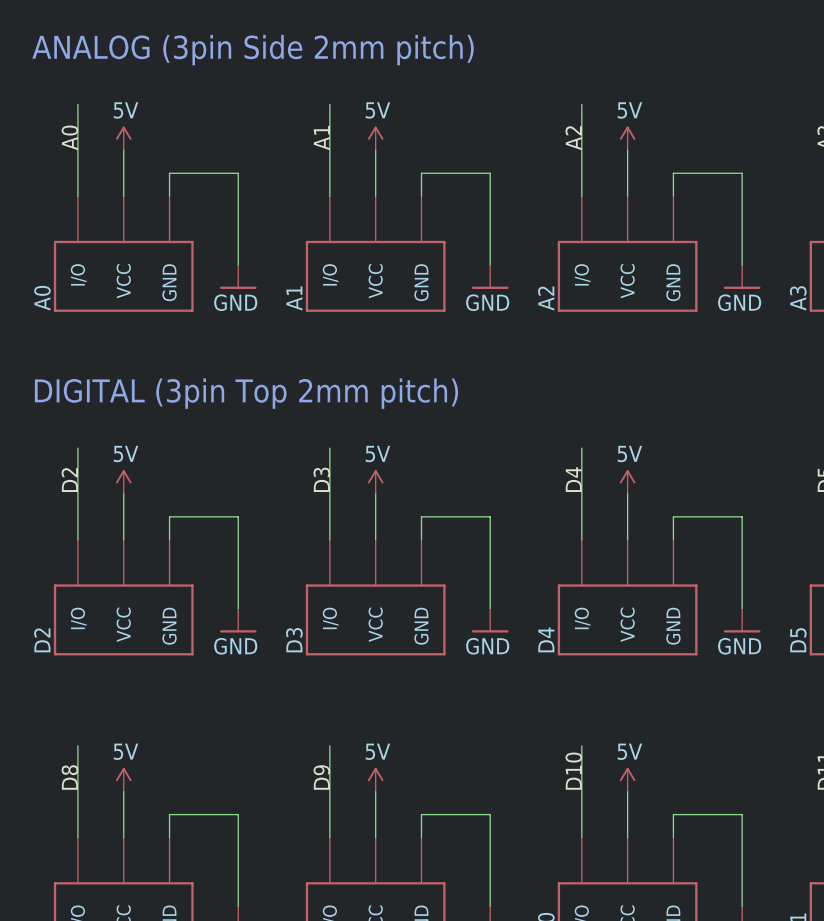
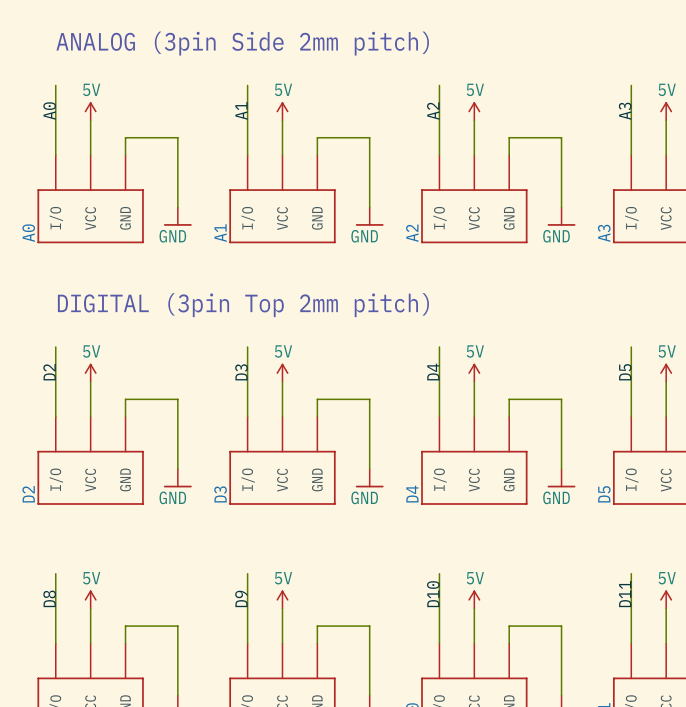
text position: ANALOG (3pin Side 2mm pitch) (253, 50) -> ANALOG (3pin Side 2mm pitch) (242, 43)
text position: DIGITAL (3pin Top 2mm pitch) (246, 393) -> DIGITAL (3pin Top 2mm pitch) (243, 305)

